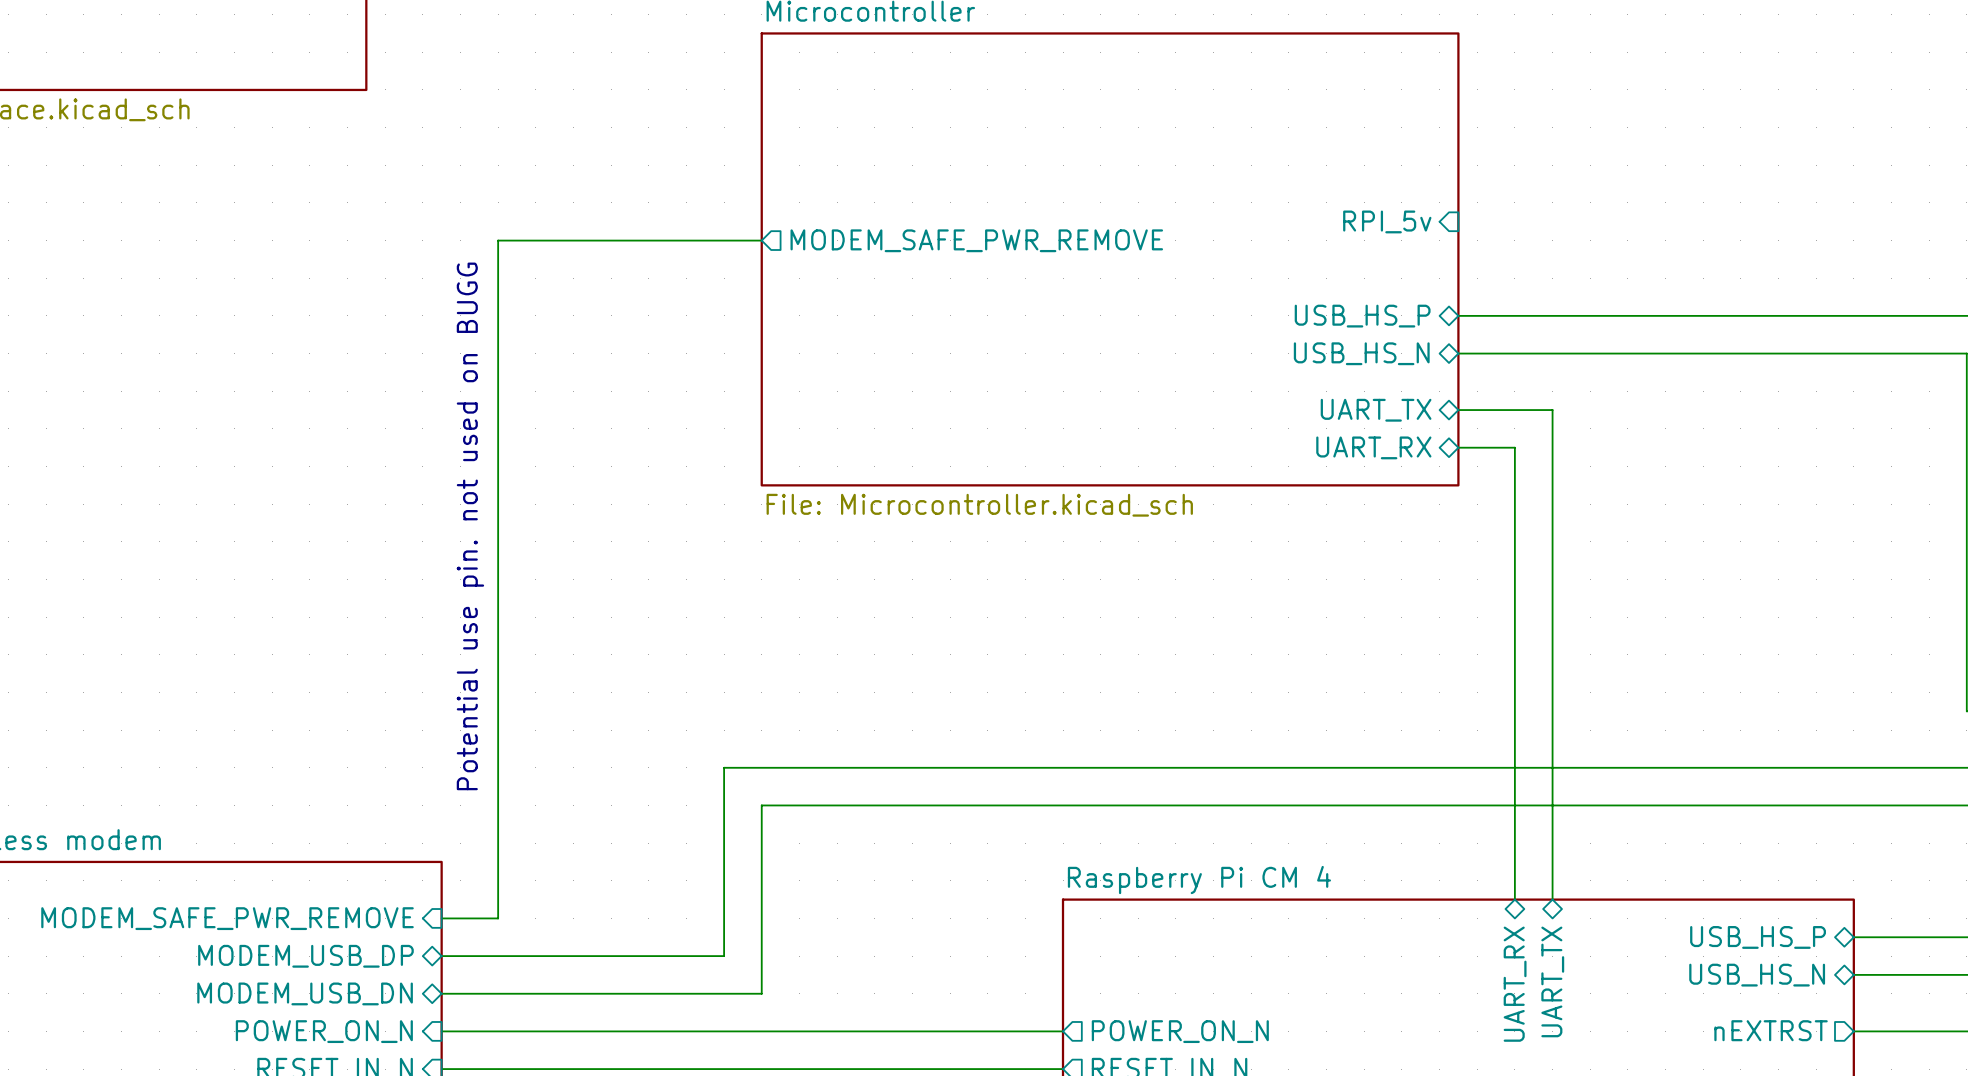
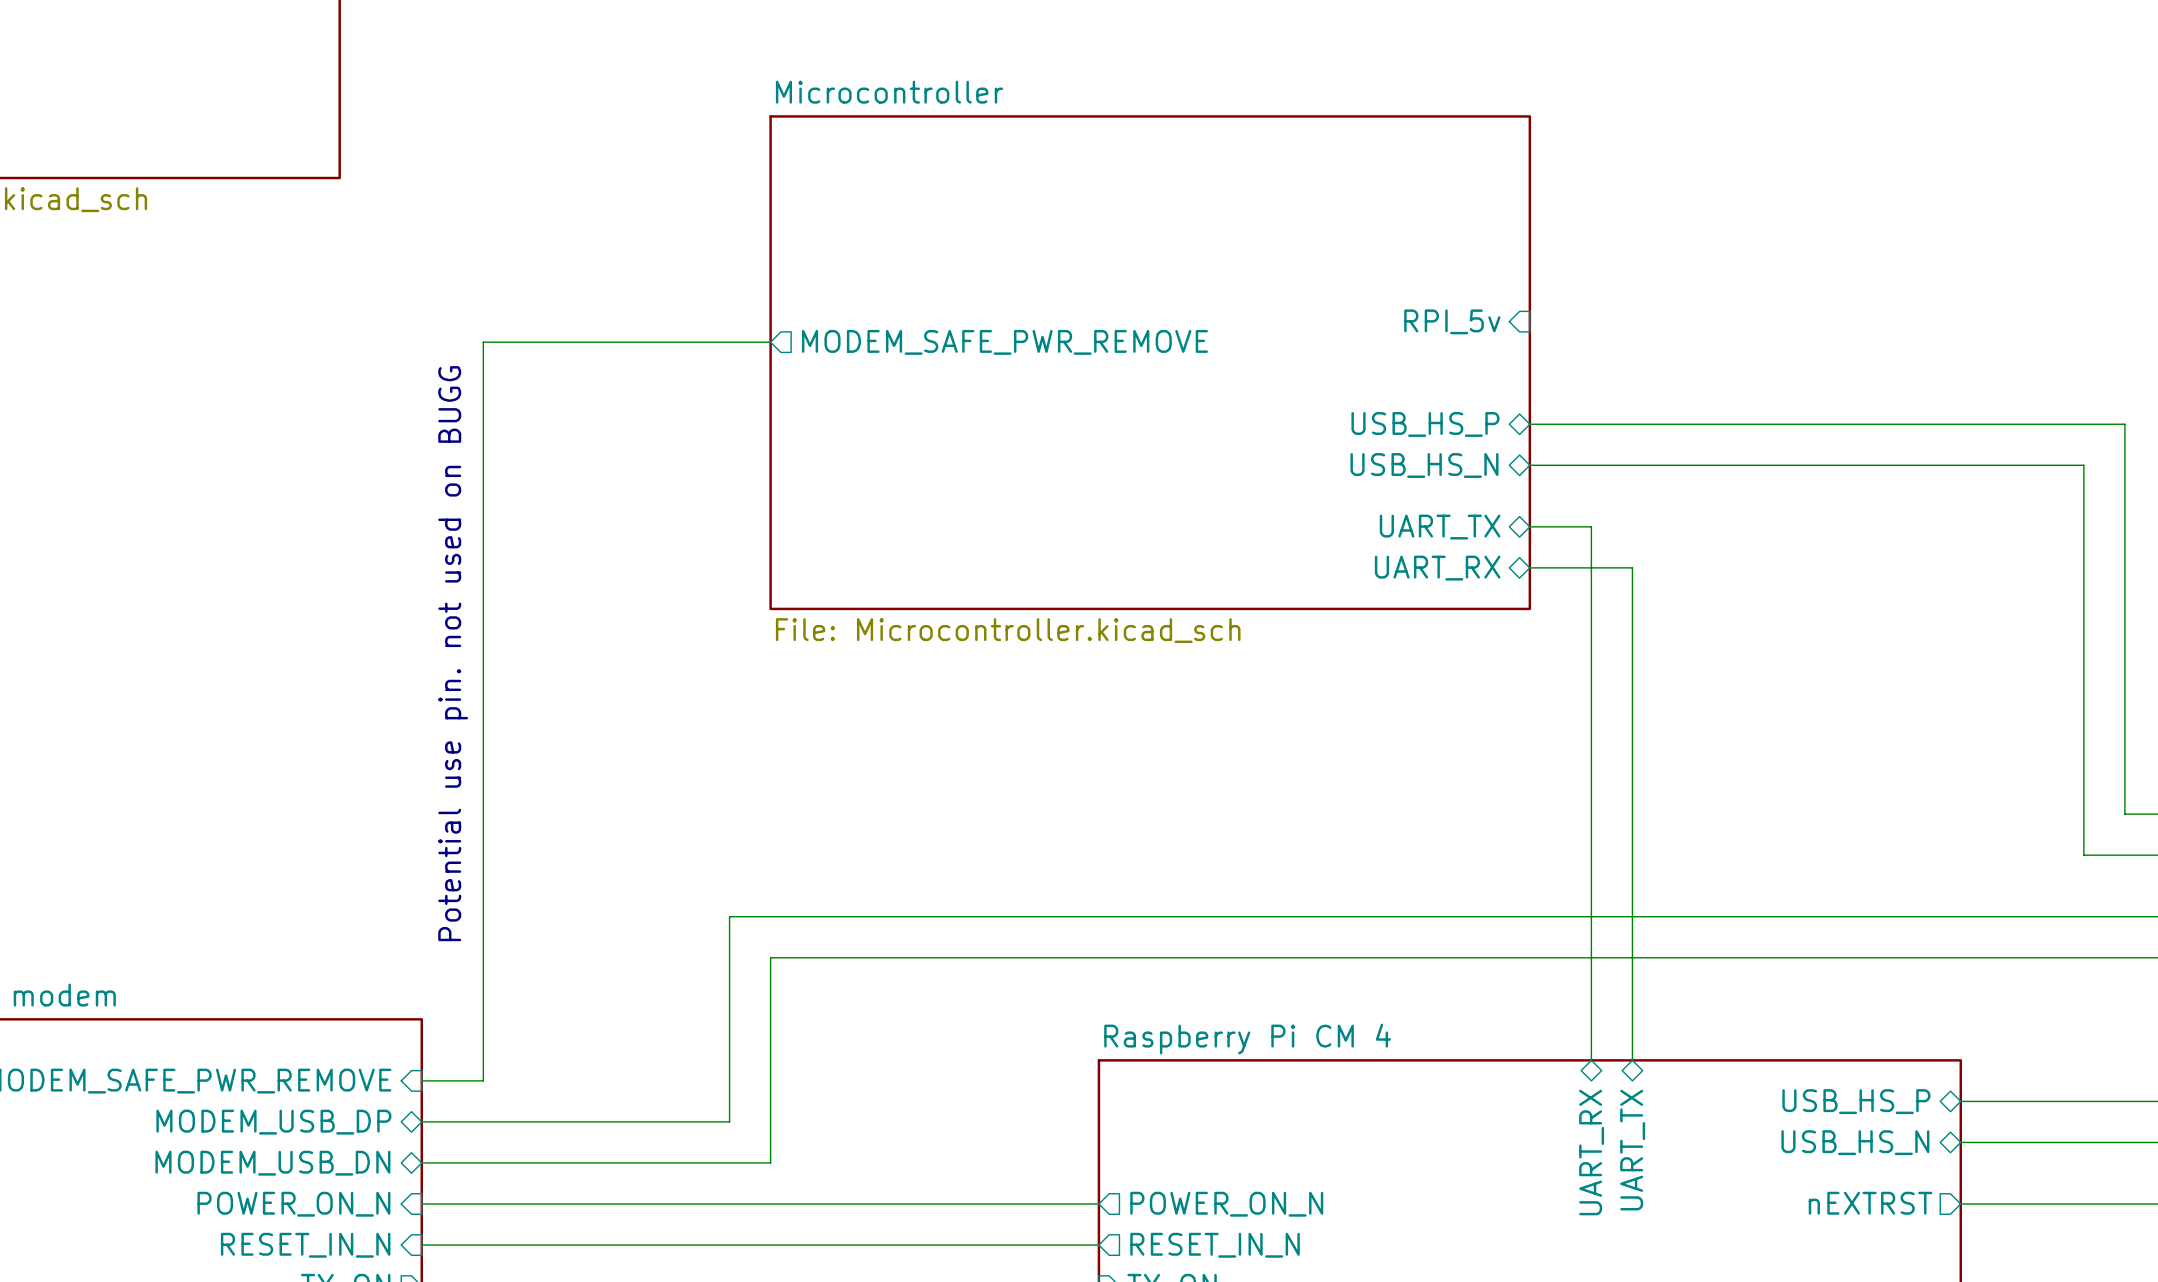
wire: (1514, 410) (1552, 410) (1552, 447) -> (1591, 526) (1591, 567) (1632, 567)

